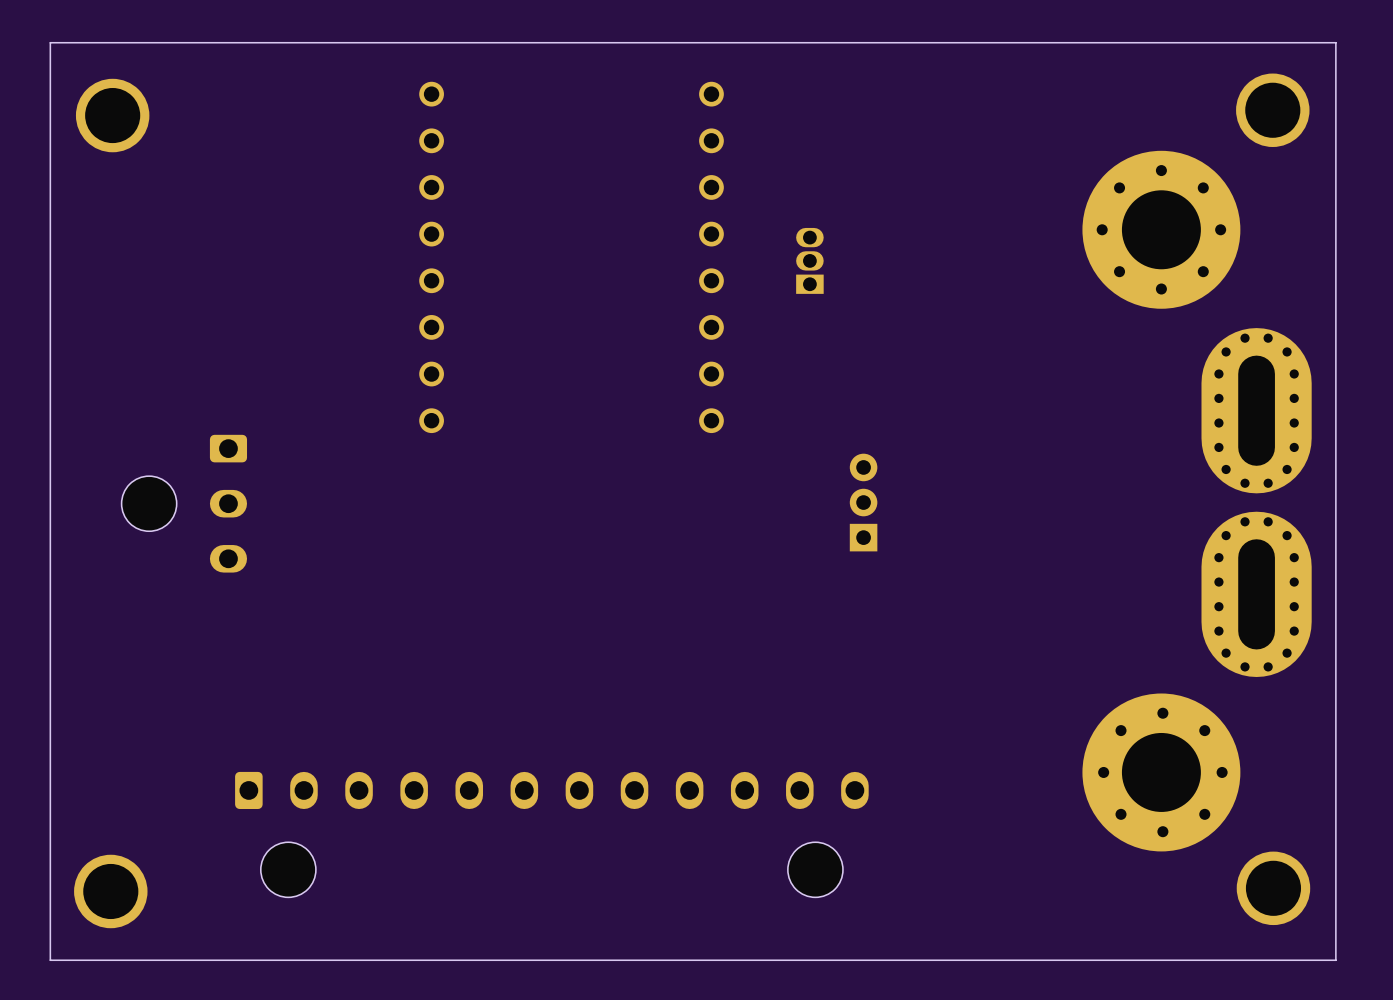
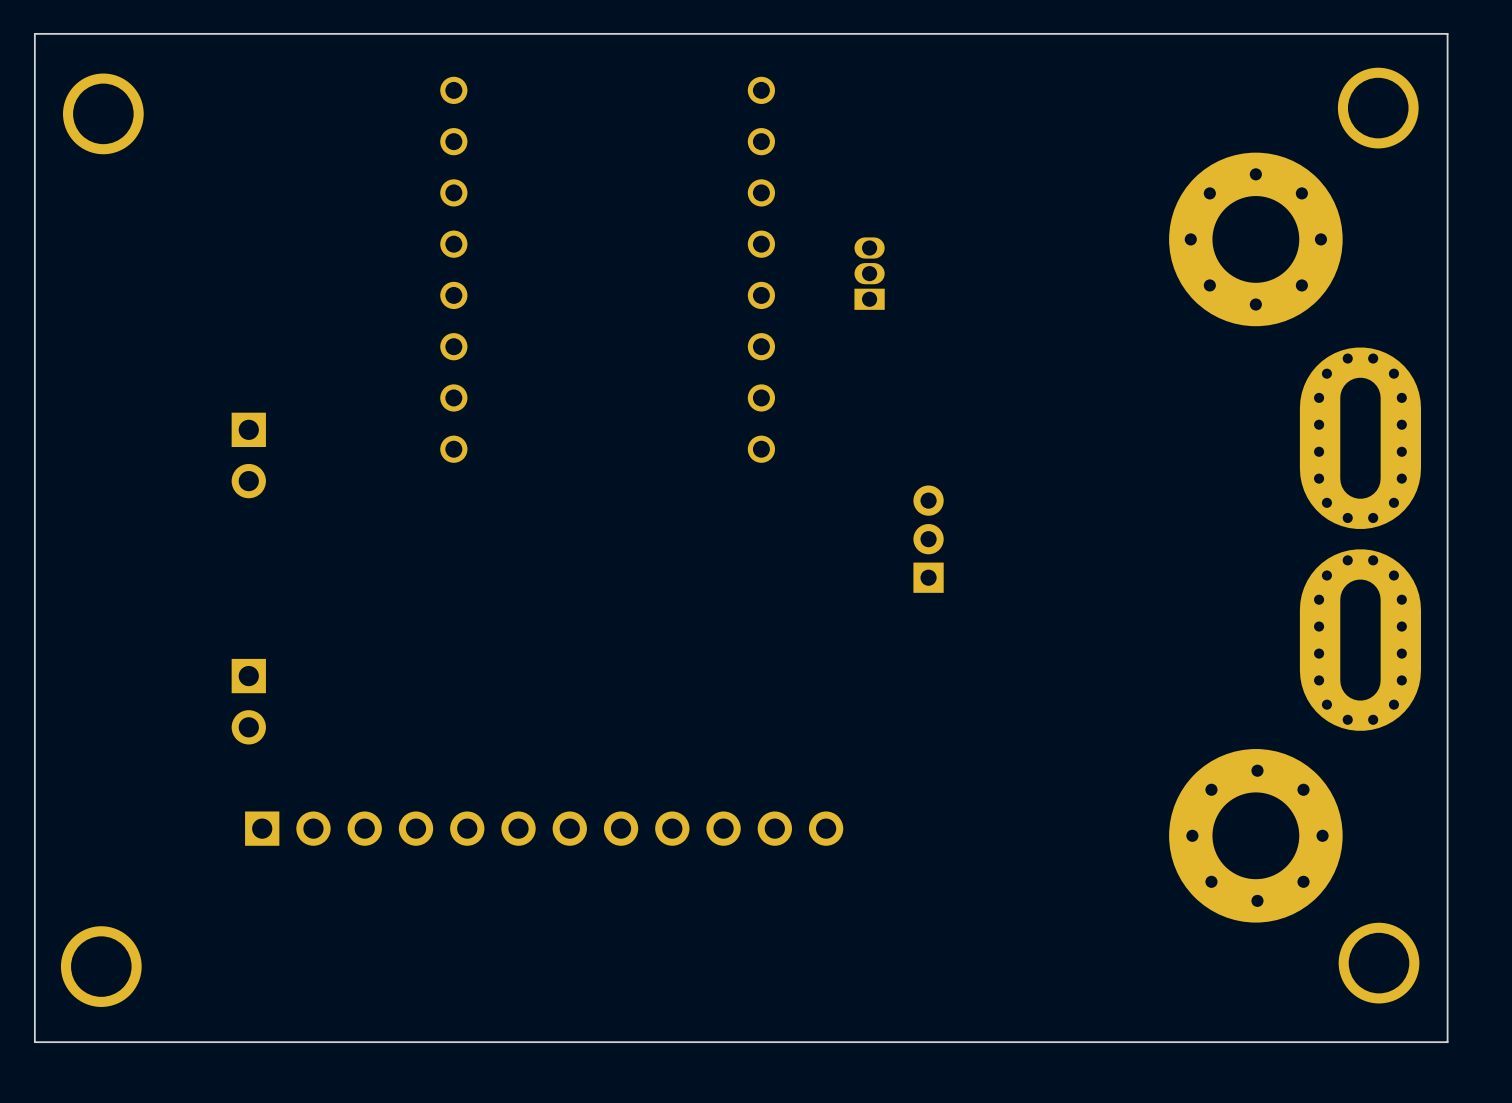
part: none -> (248, 455)
part: (184, 503) -> none
part: none -> (248, 701)
part: none -> (544, 828)
part: (551, 834) -> none

